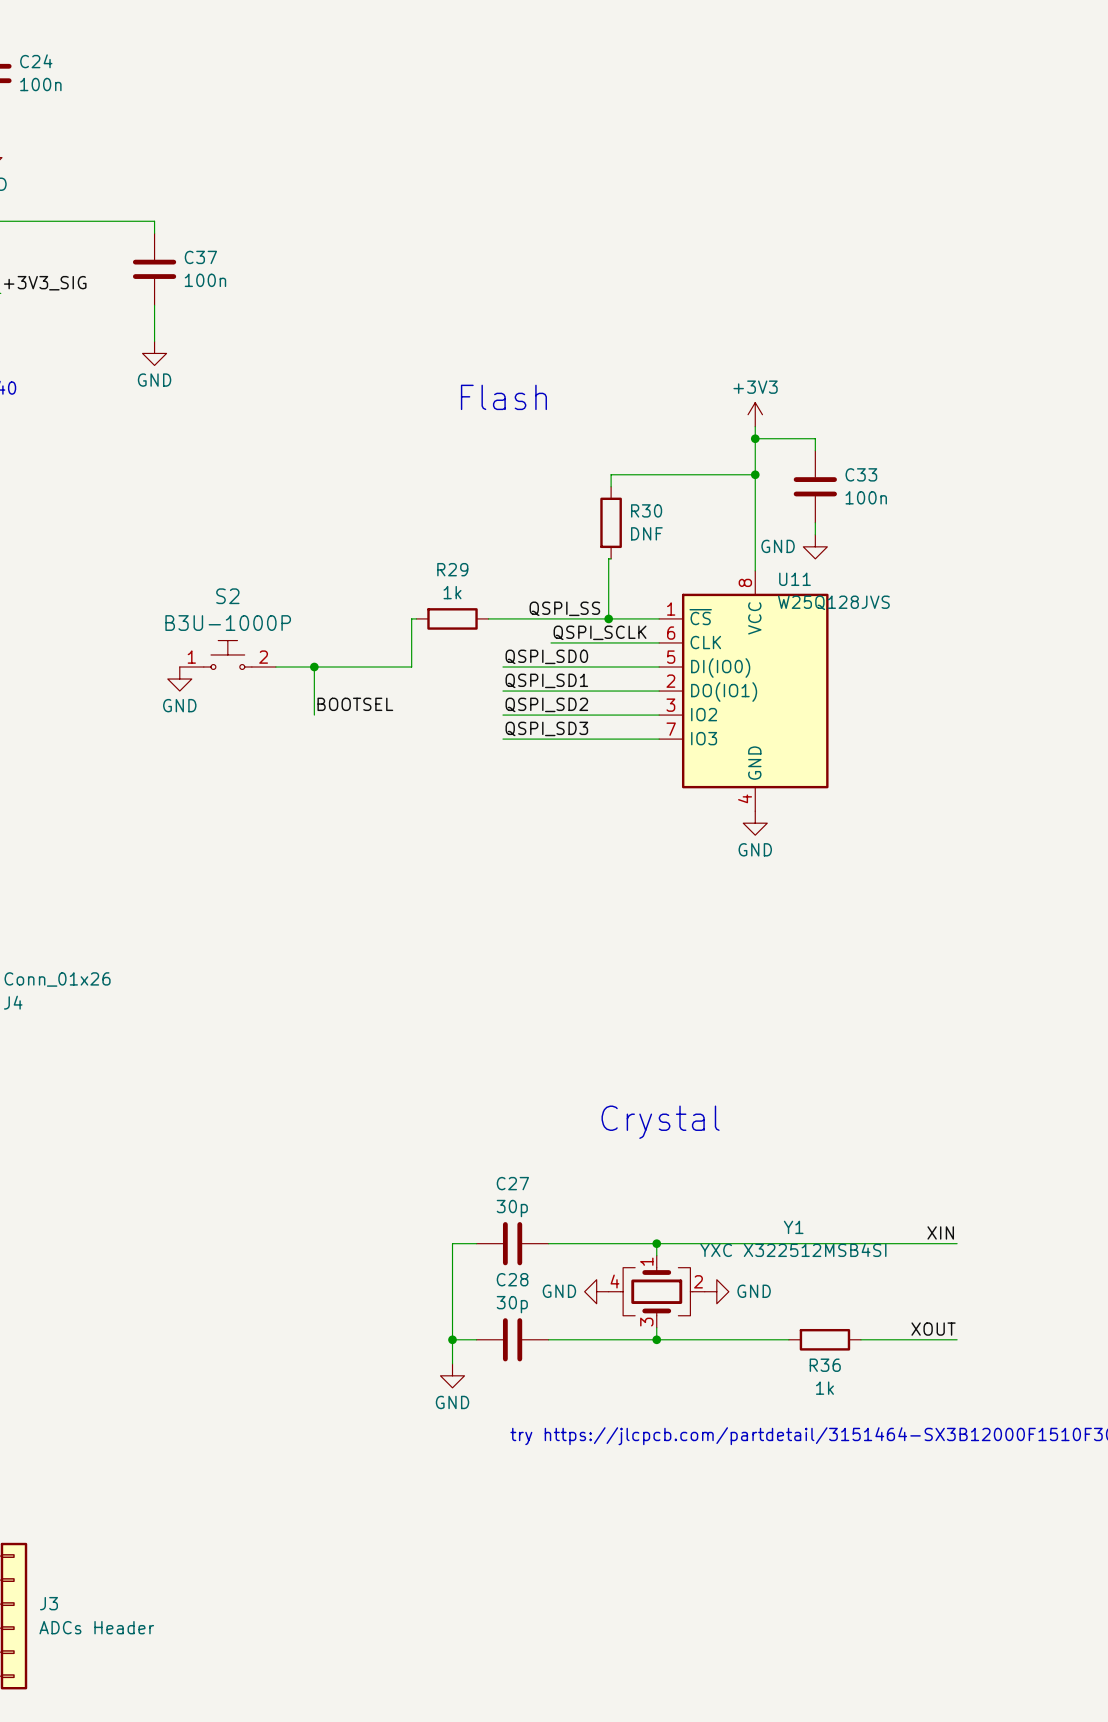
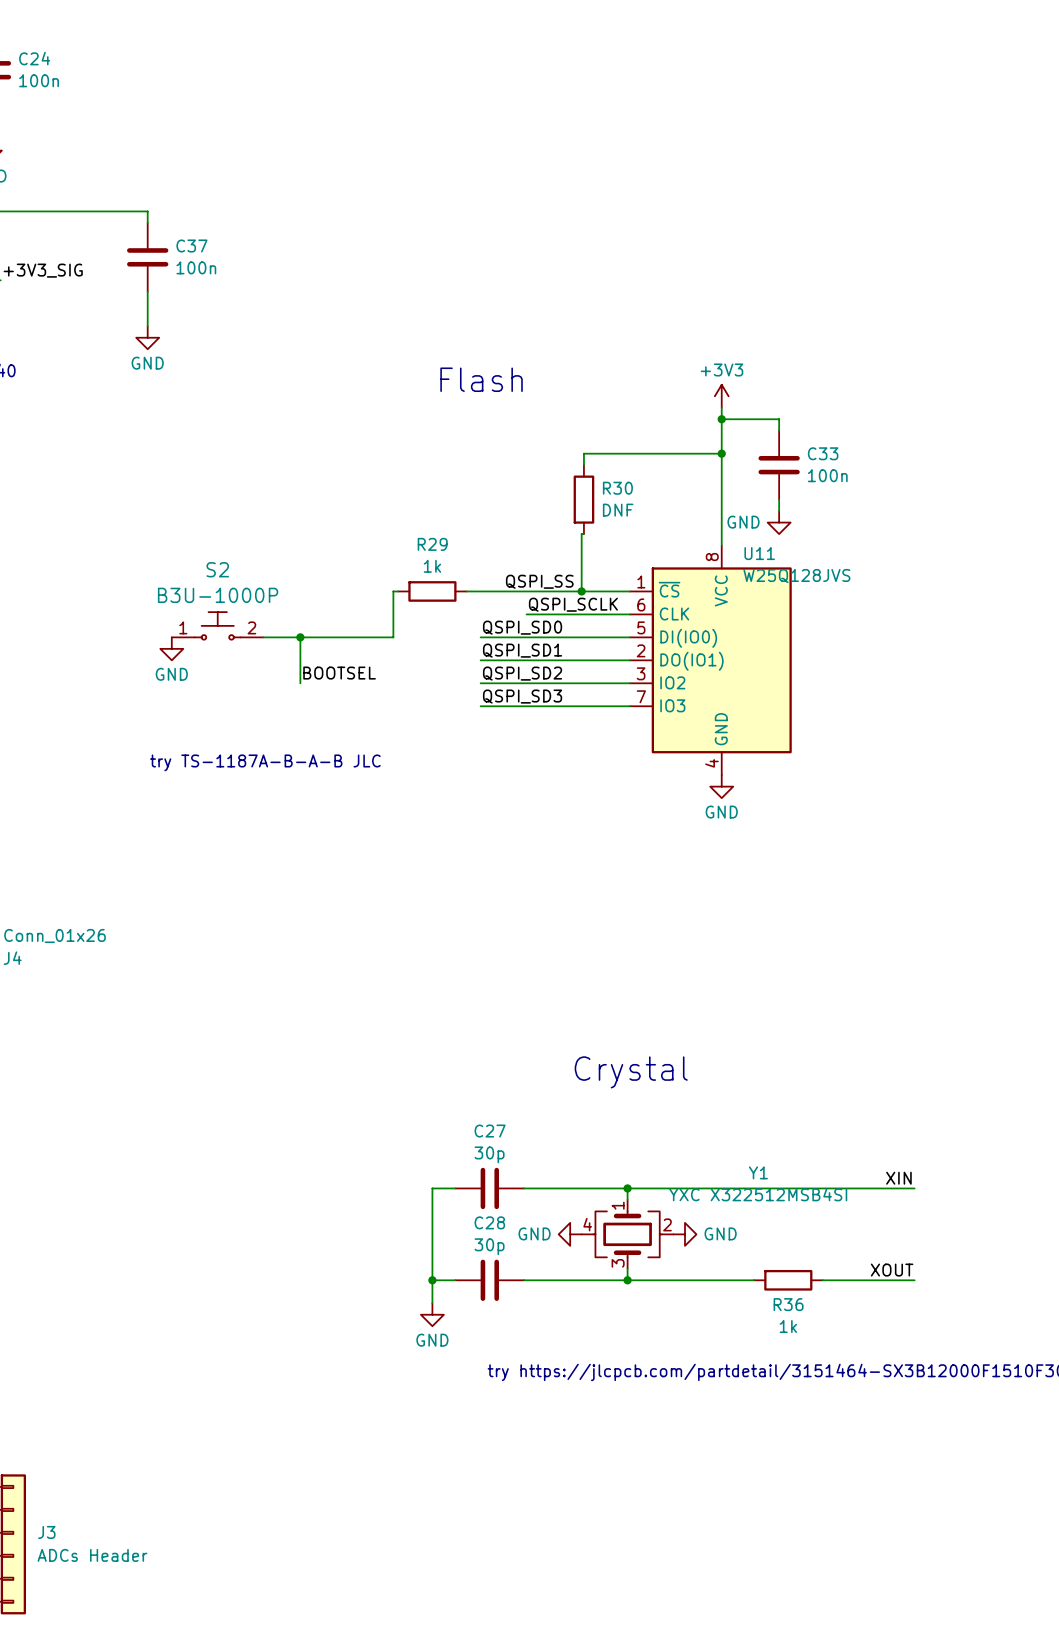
text: none -> try TS-1187A-B-A-B JLC (265, 762)

